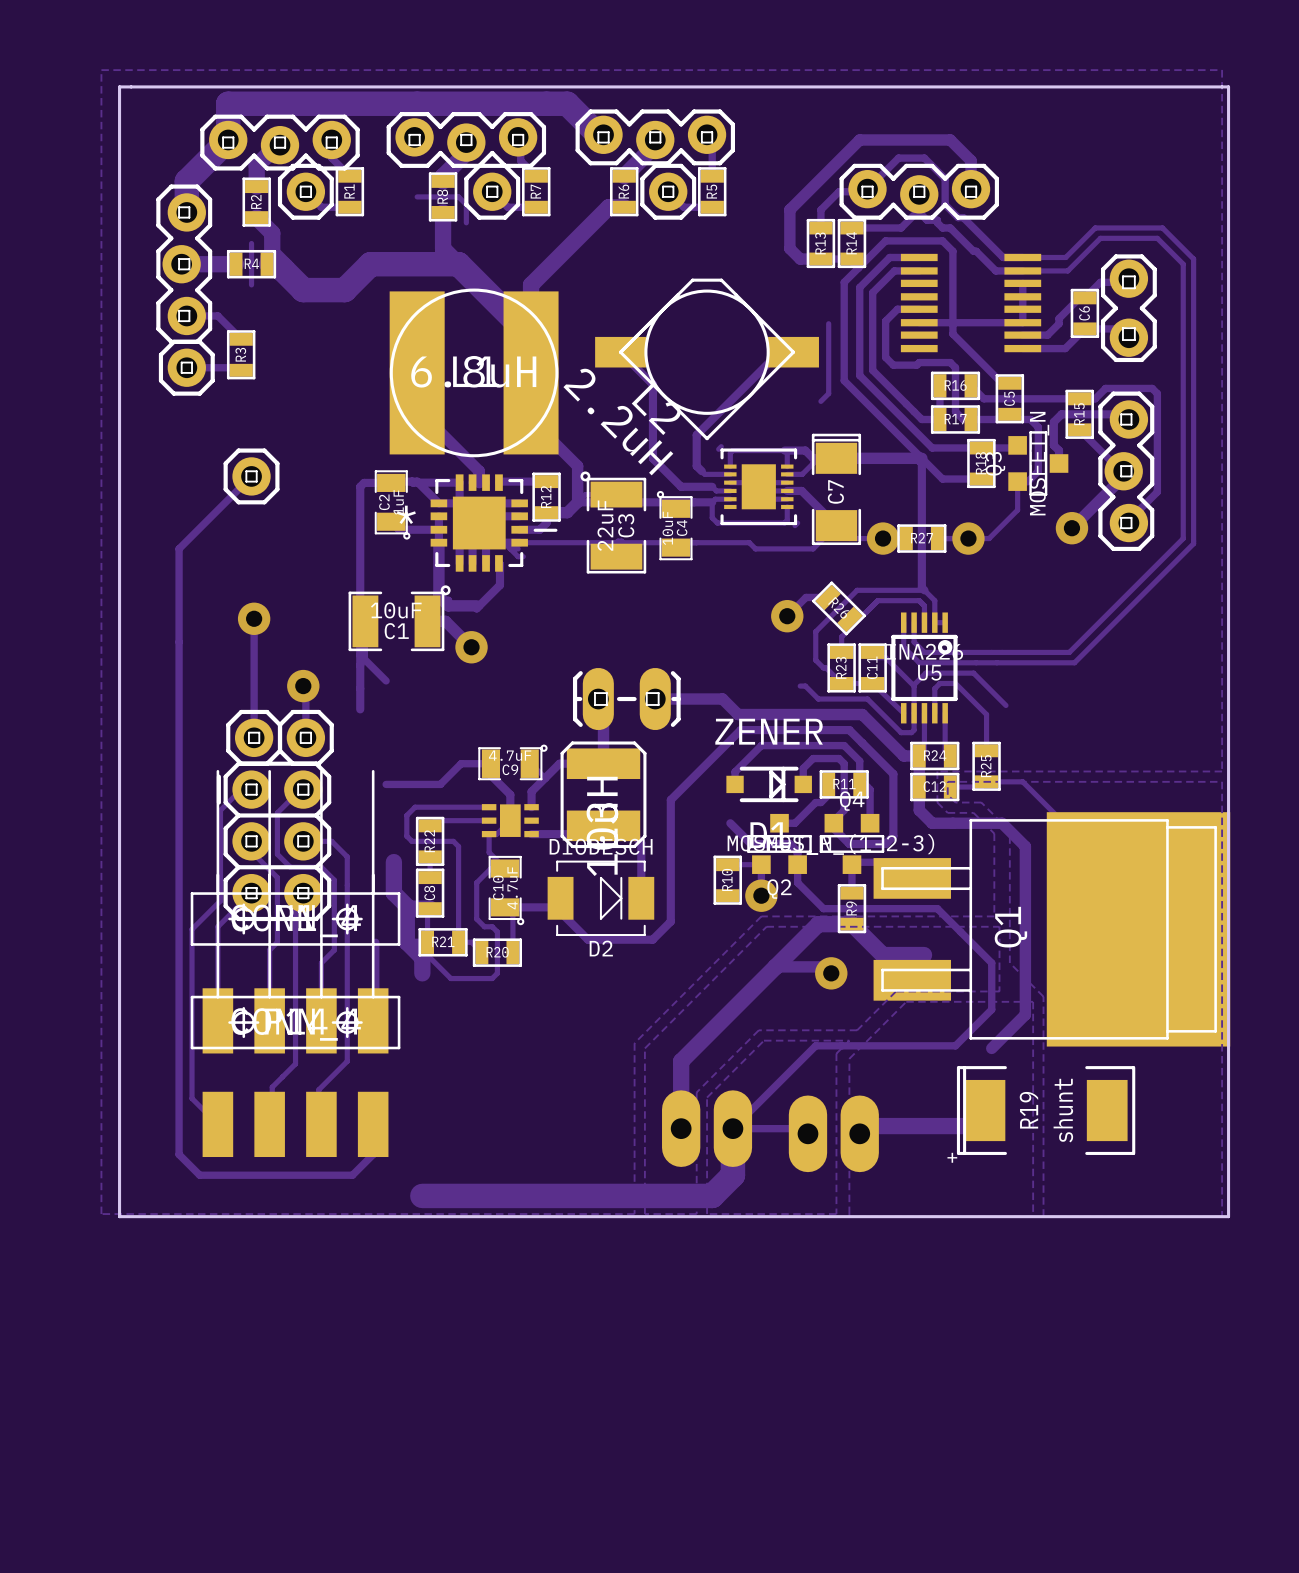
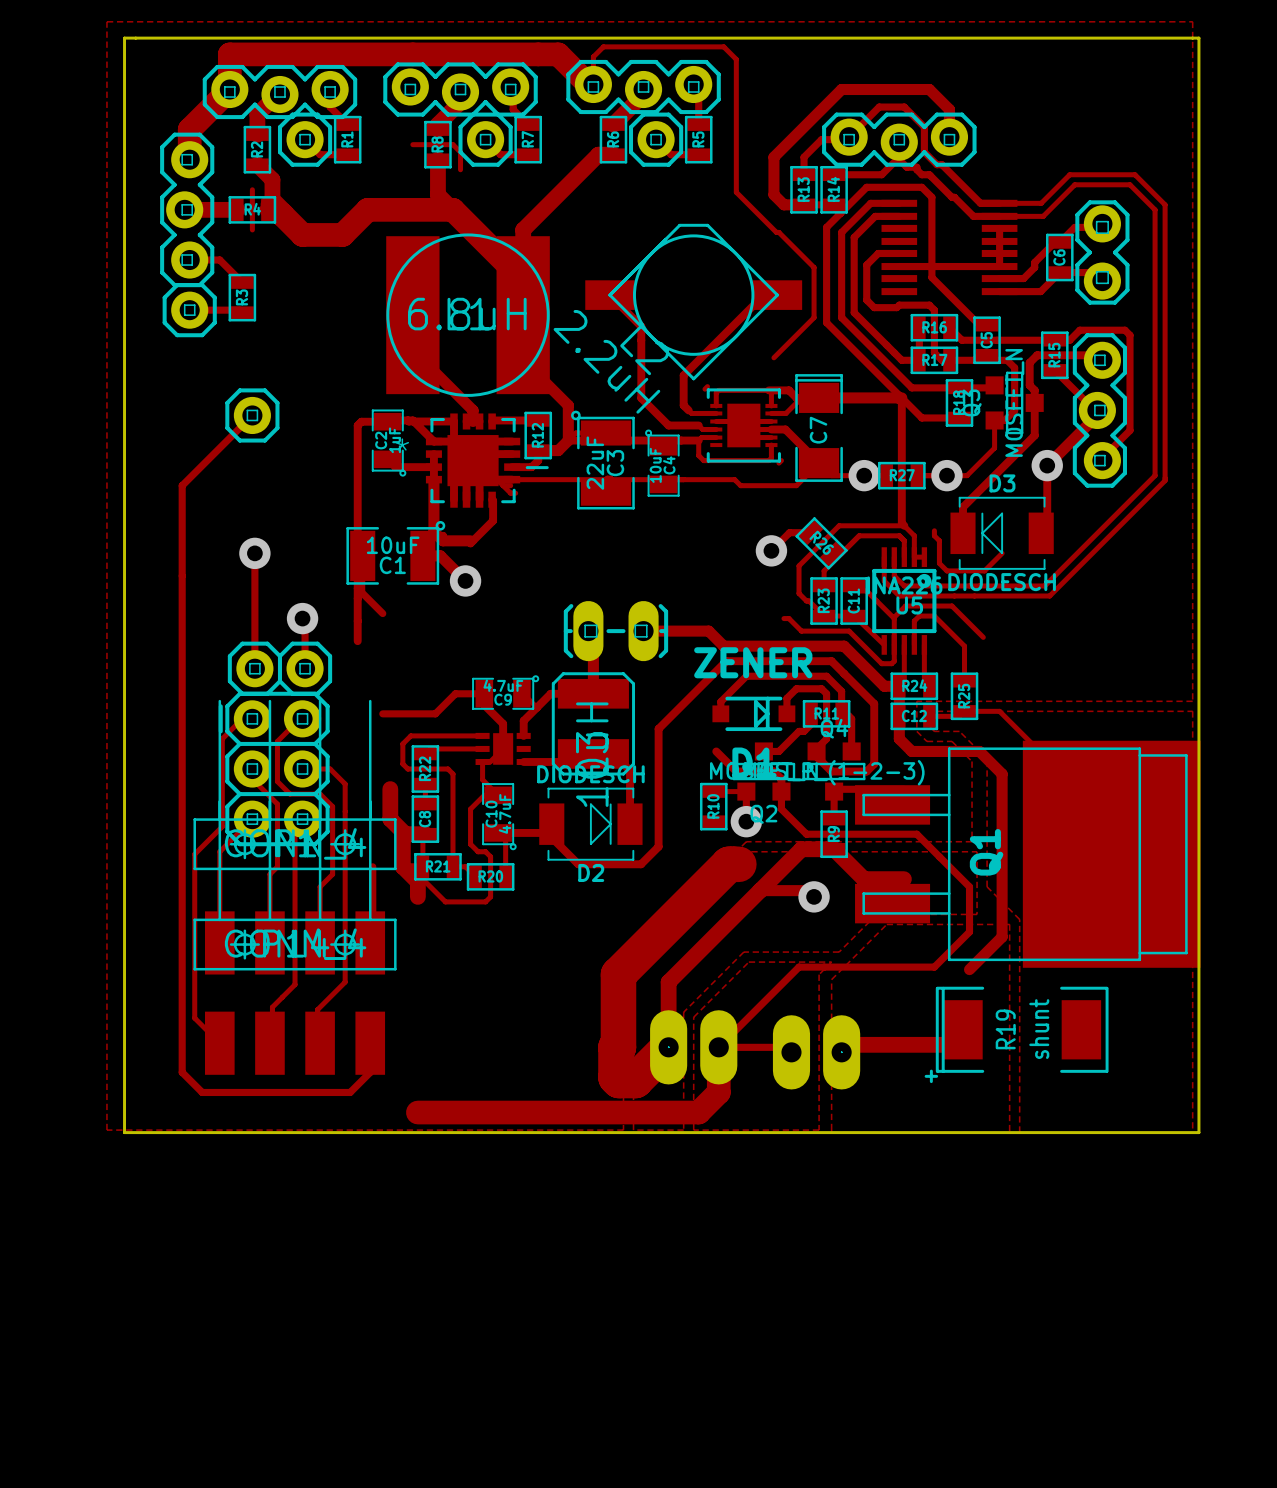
track: none -> (593, 84) (593, 56) (603, 46) (723, 46) (736, 59) (736, 192) (814, 267) (814, 317) (773, 357)
track: (828, 323) (828, 393) (820, 401) -> none
track: none -> (1034, 402) (1034, 435) (963, 507) (963, 533)
track: none -> (1047, 465) (1047, 527) (1041, 533)
track: none -> (934, 530) (934, 535) (939, 540) (939, 563) (946, 570) (984, 570) (1002, 553)
D3: none -> DIODESCH (1002, 533)
track: none -> (738, 864) (728, 864) (618, 974) (618, 1047) (615, 1047) (615, 1077) (619, 1080) (635, 1080) (668, 1047)

